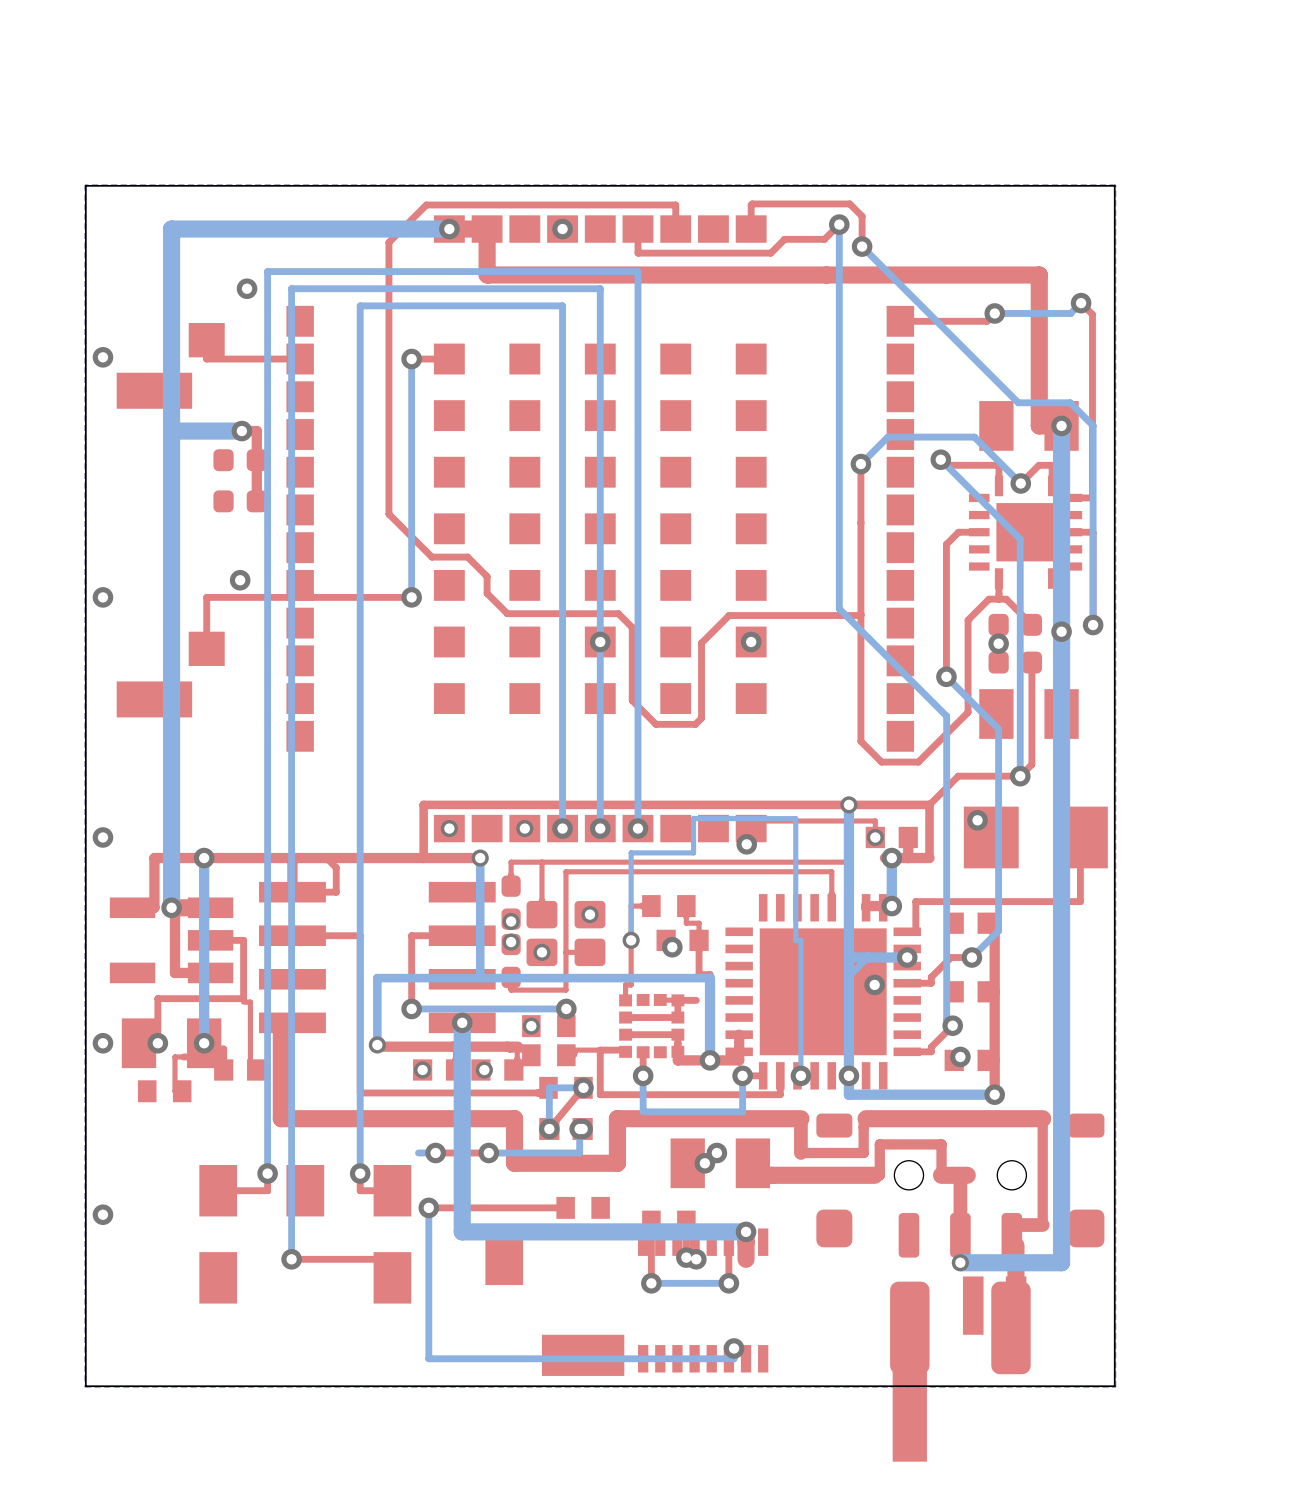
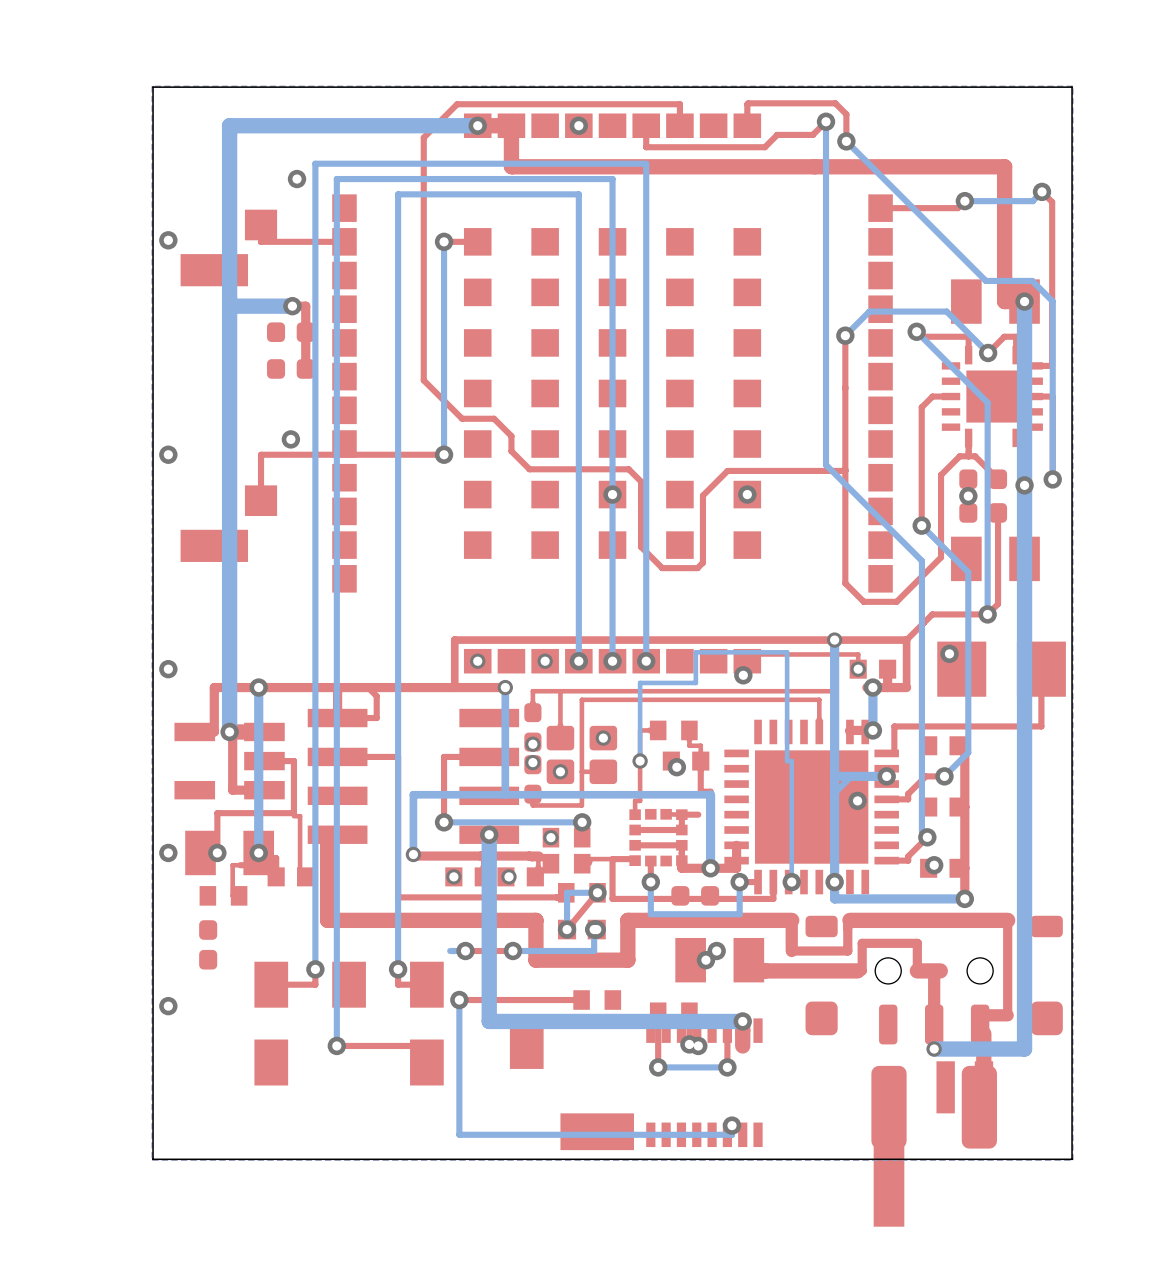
part: none -> (695, 895)
part: none -> (208, 944)

